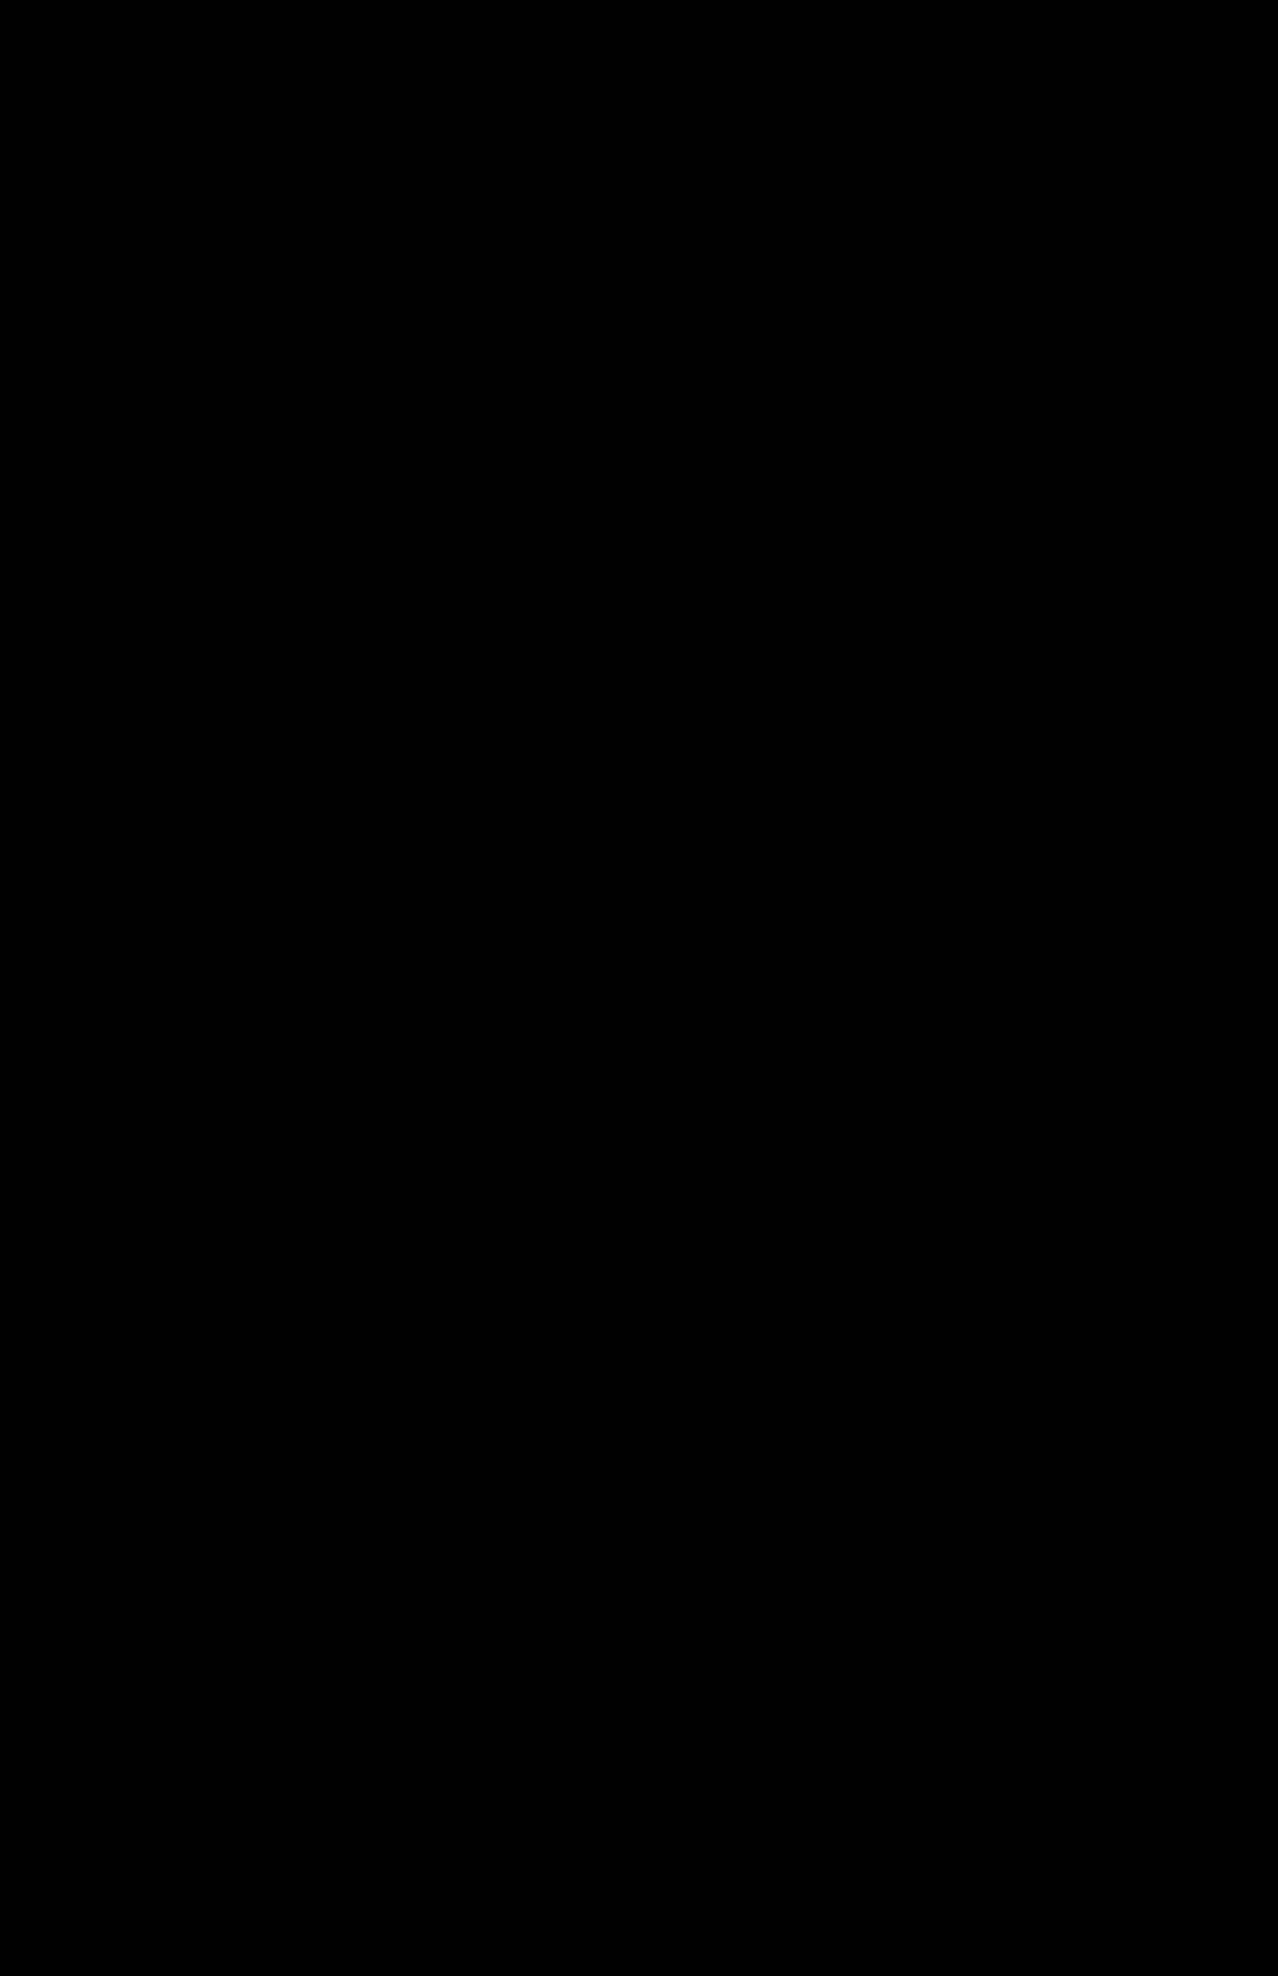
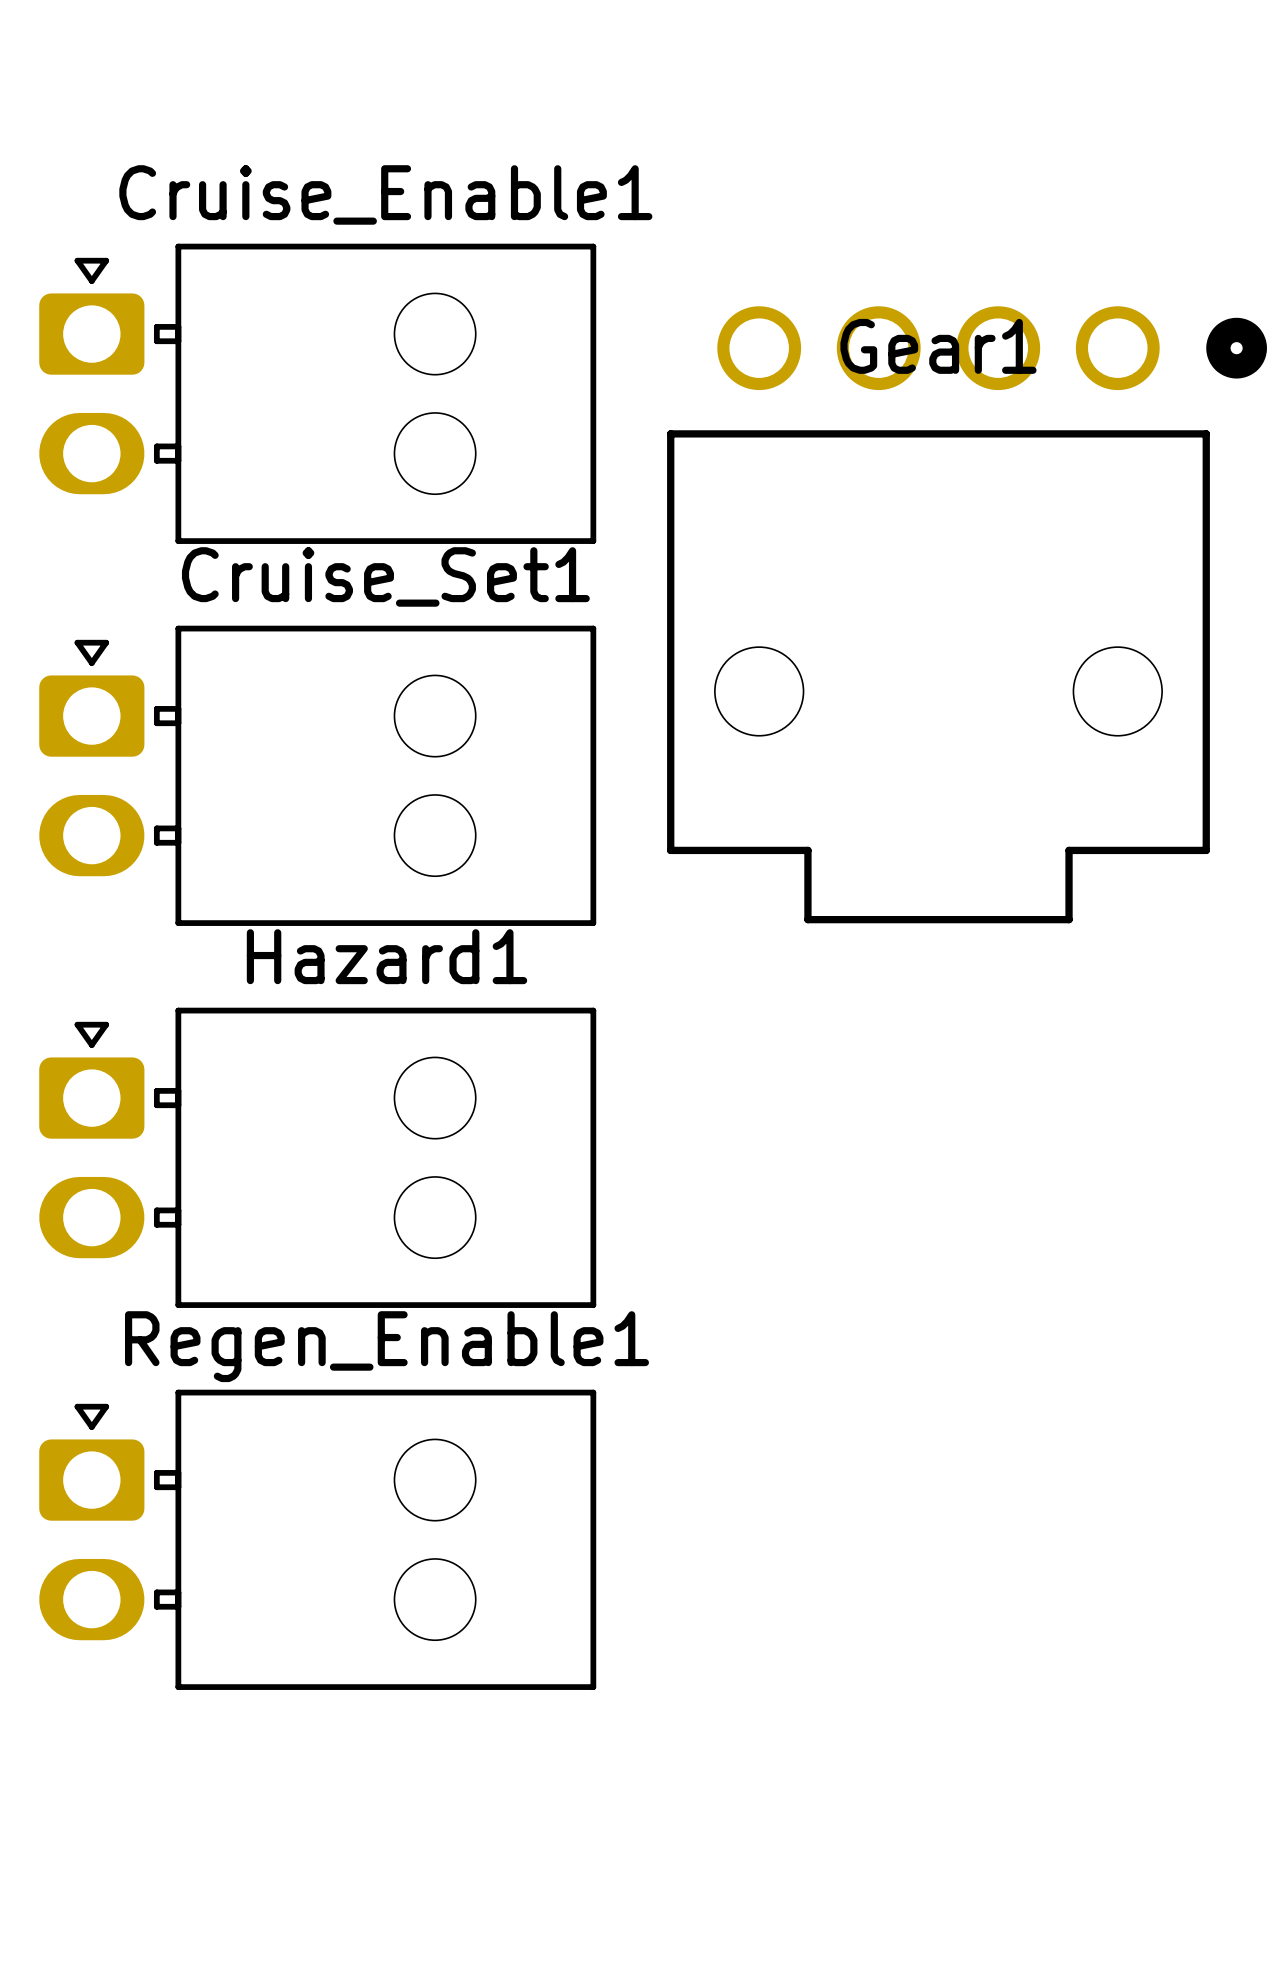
Cruise_Enable1: none -> (317, 393)
Gear1: none -> (967, 614)
Cruise_Set1: none -> (317, 775)
Hazard1: none -> (317, 1157)
Regen_Enable1: none -> (317, 1539)

